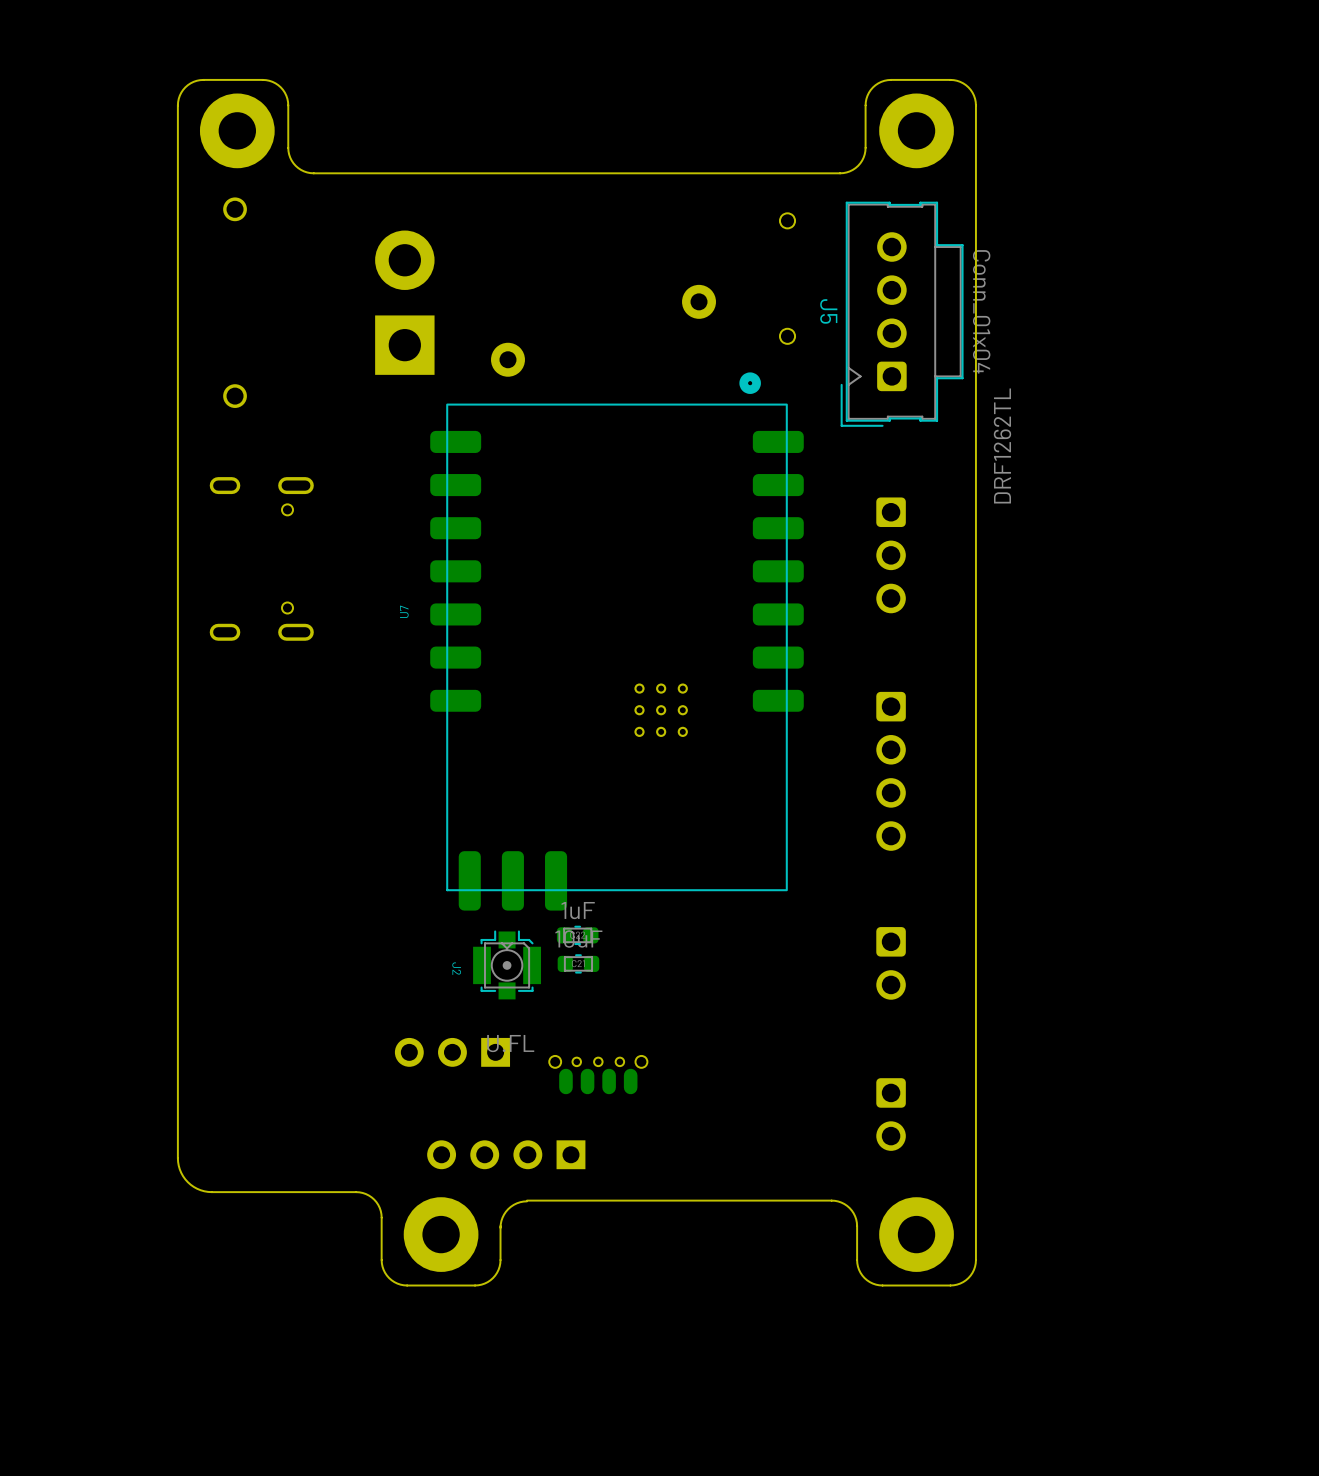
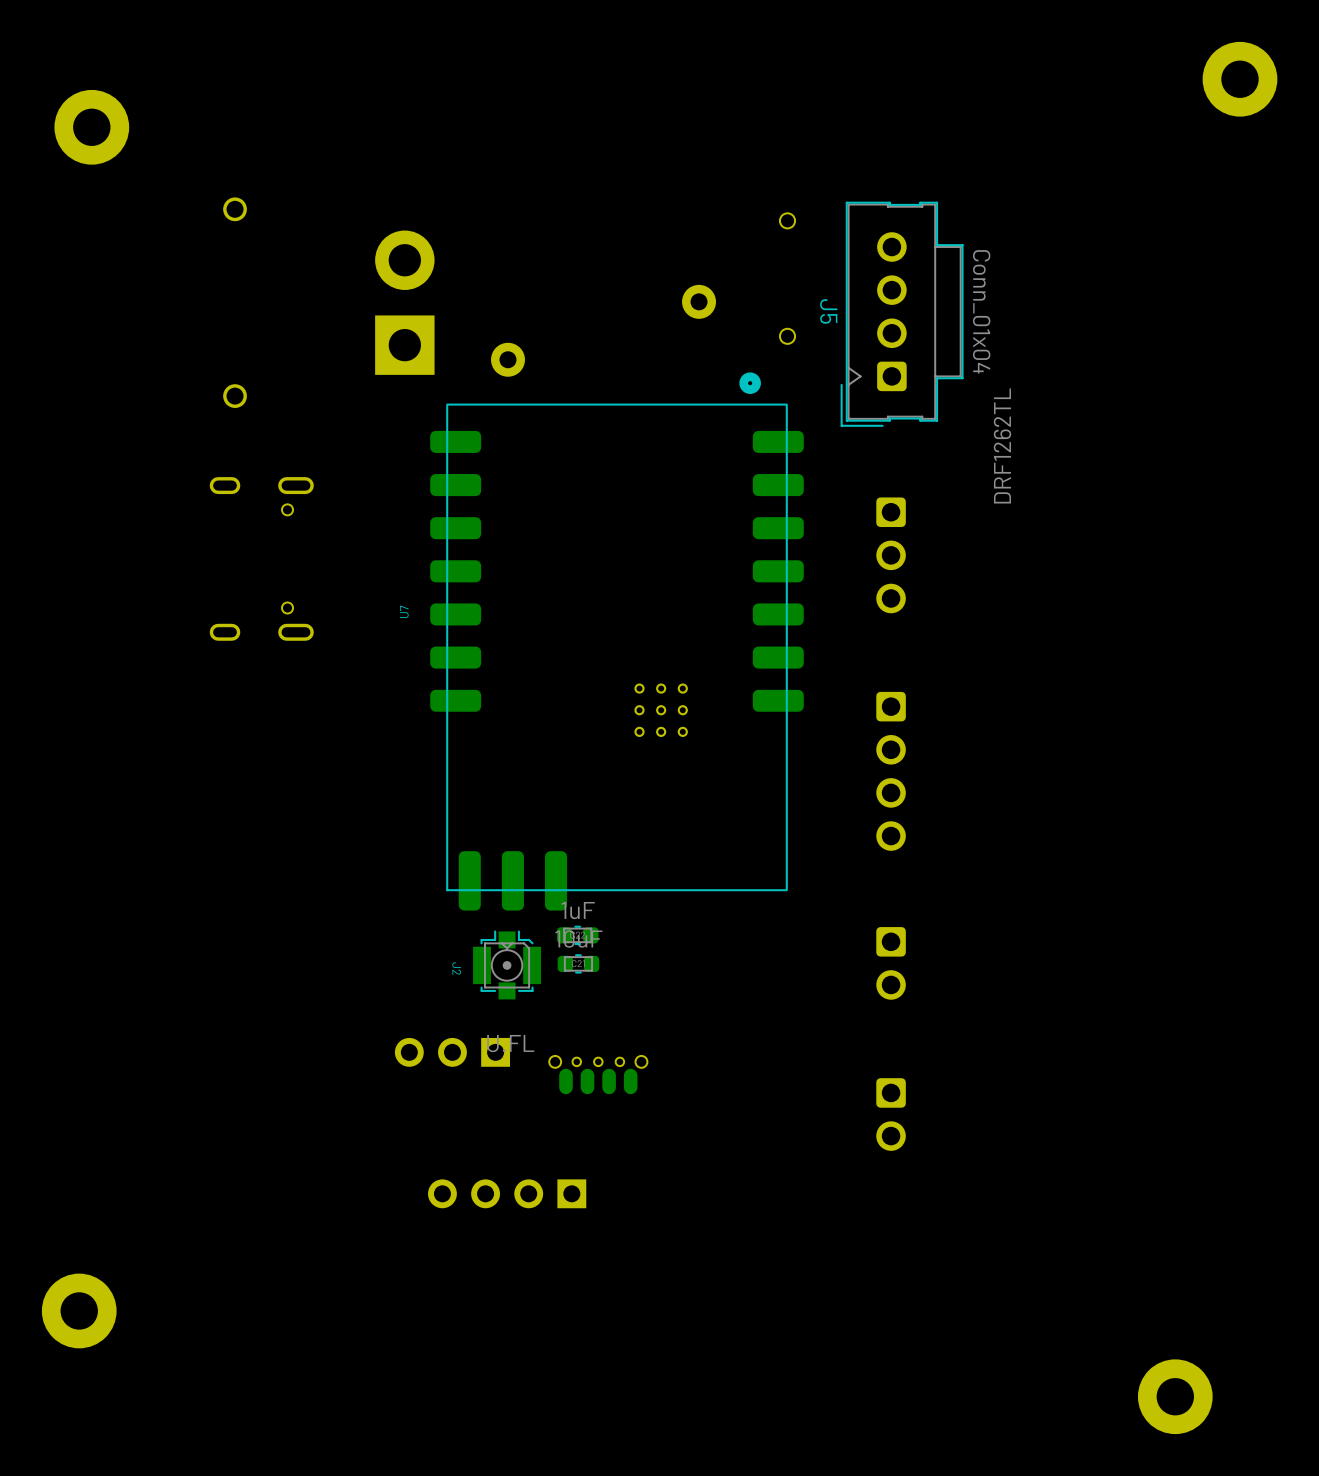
part position: (237, 130) -> (91, 127)
part position: (916, 130) -> (1240, 79)
part position: (506, 1154) -> (507, 1193)
board edge: (527, 1200) (834, 1200) (847, 1205) (855, 1216) (857, 1266) (862, 1275) (869, 1282) (882, 1285) (953, 1285) (965, 1280) (974, 1269) (975, 1260) (975, 105) (970, 89) (960, 81) (950, 79) (891, 79) (875, 85) (869, 92) (865, 102) (865, 147) (863, 157) (855, 168) (840, 173) (310, 173) (298, 168) (290, 157) (288, 147) (288, 102) (283, 89) (275, 83) (262, 79) (200, 80) (187, 85) (179, 95) (177, 105) (178, 1165) (187, 1182) (197, 1188) (208, 1191) (356, 1192) (368, 1195) (376, 1202) (381, 1214) (381, 1260) (383, 1269) (391, 1280) (403, 1285) (475, 1285) (487, 1282) (495, 1275) (499, 1266) (500, 1226) -> none
board edge: (527, 1201) (516, 1203) (508, 1209) (502, 1217) (500, 1227) -> none
part position: (441, 1234) -> (79, 1310)
part position: (916, 1234) -> (1175, 1396)

